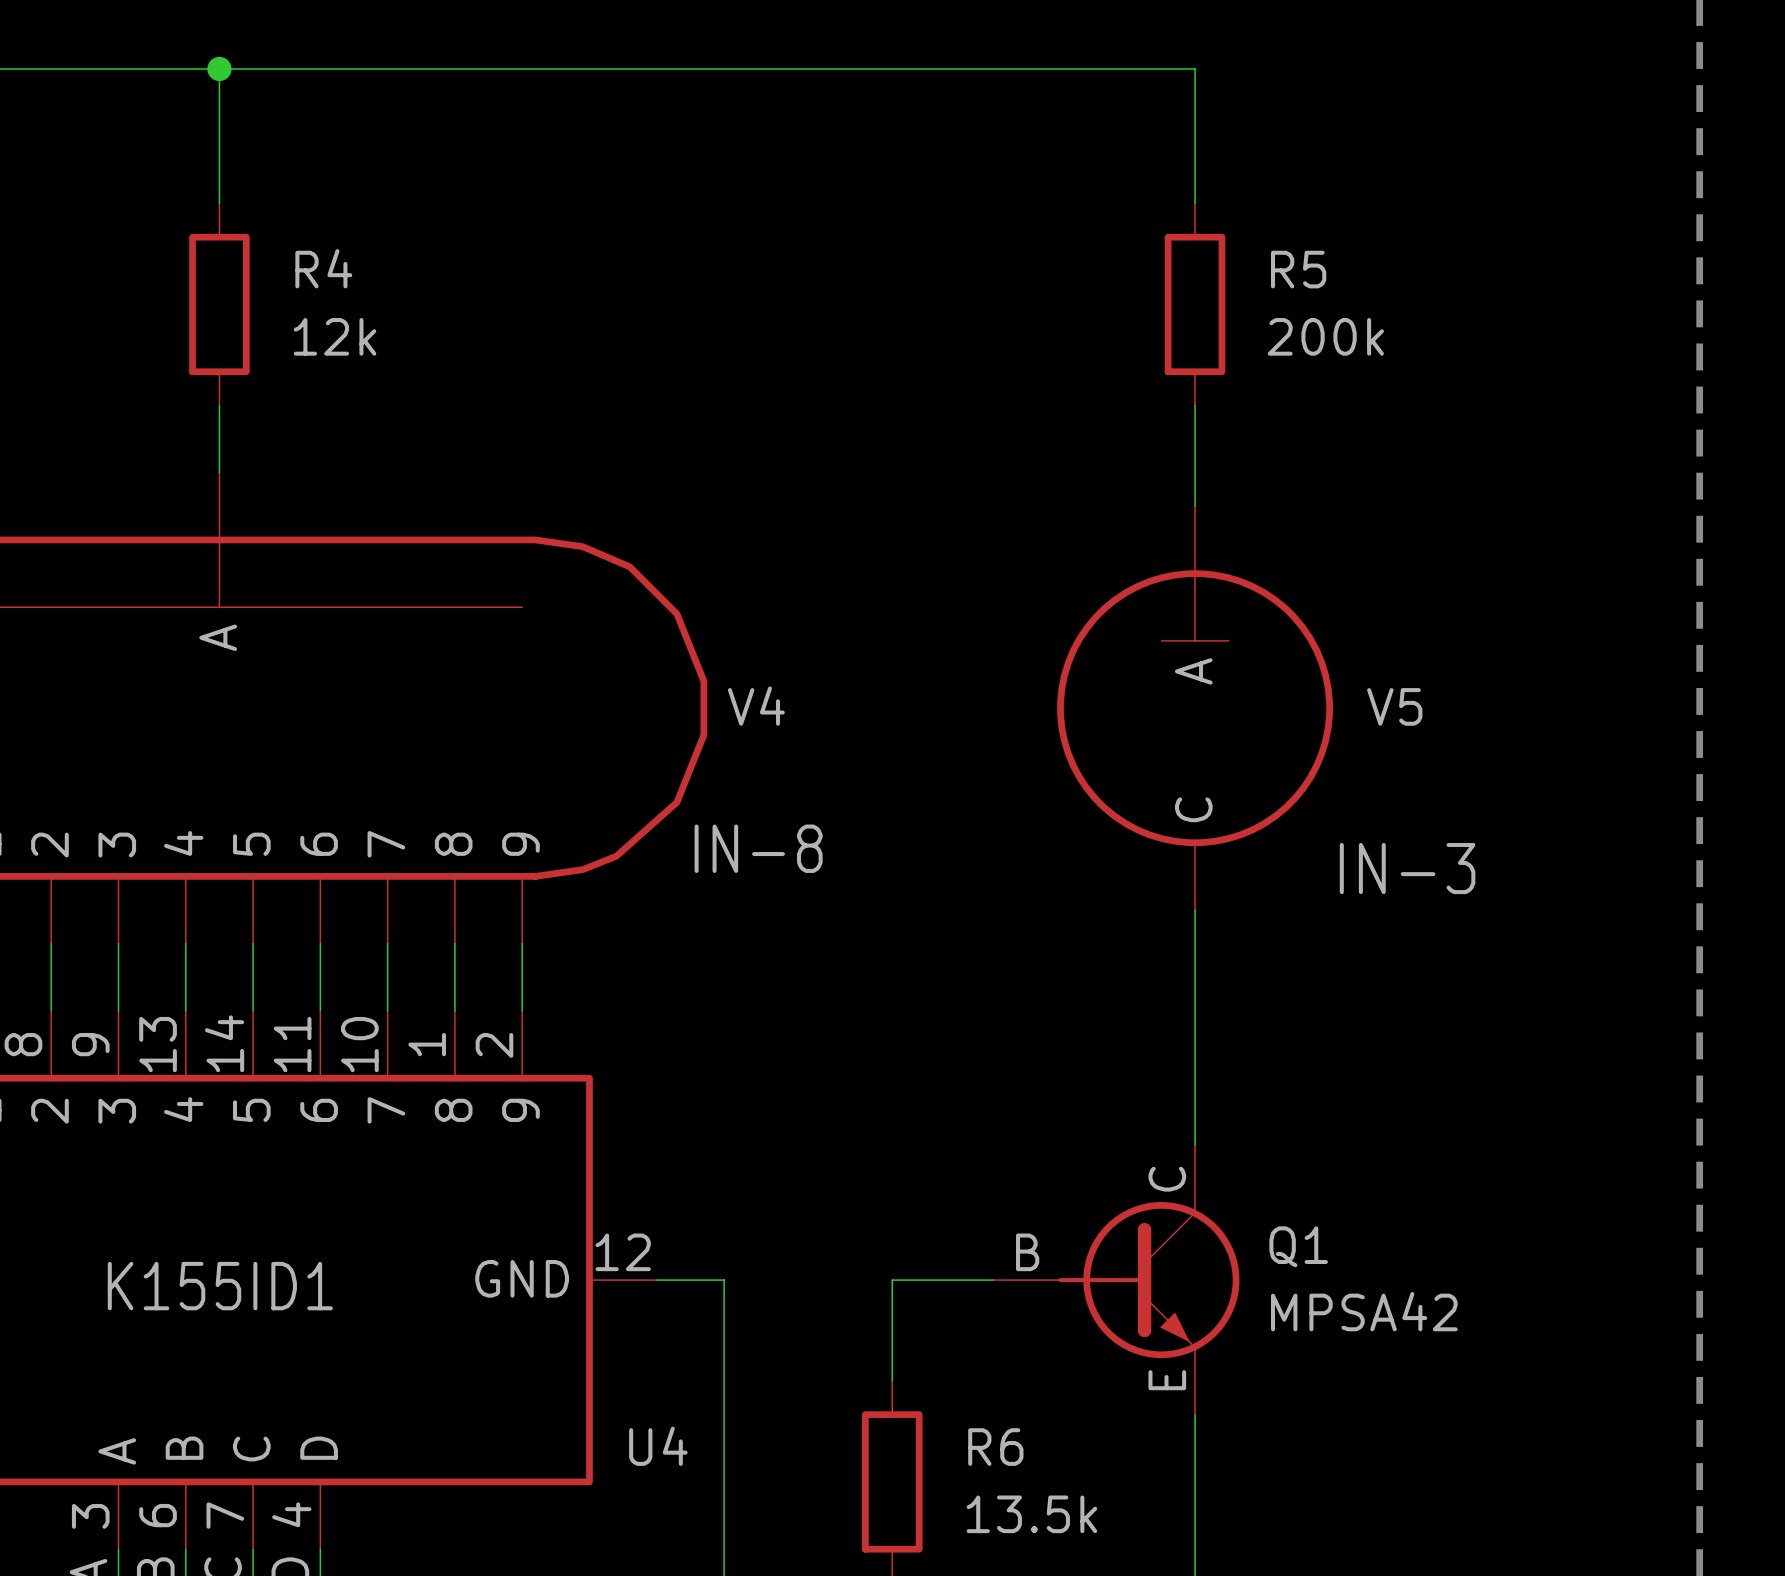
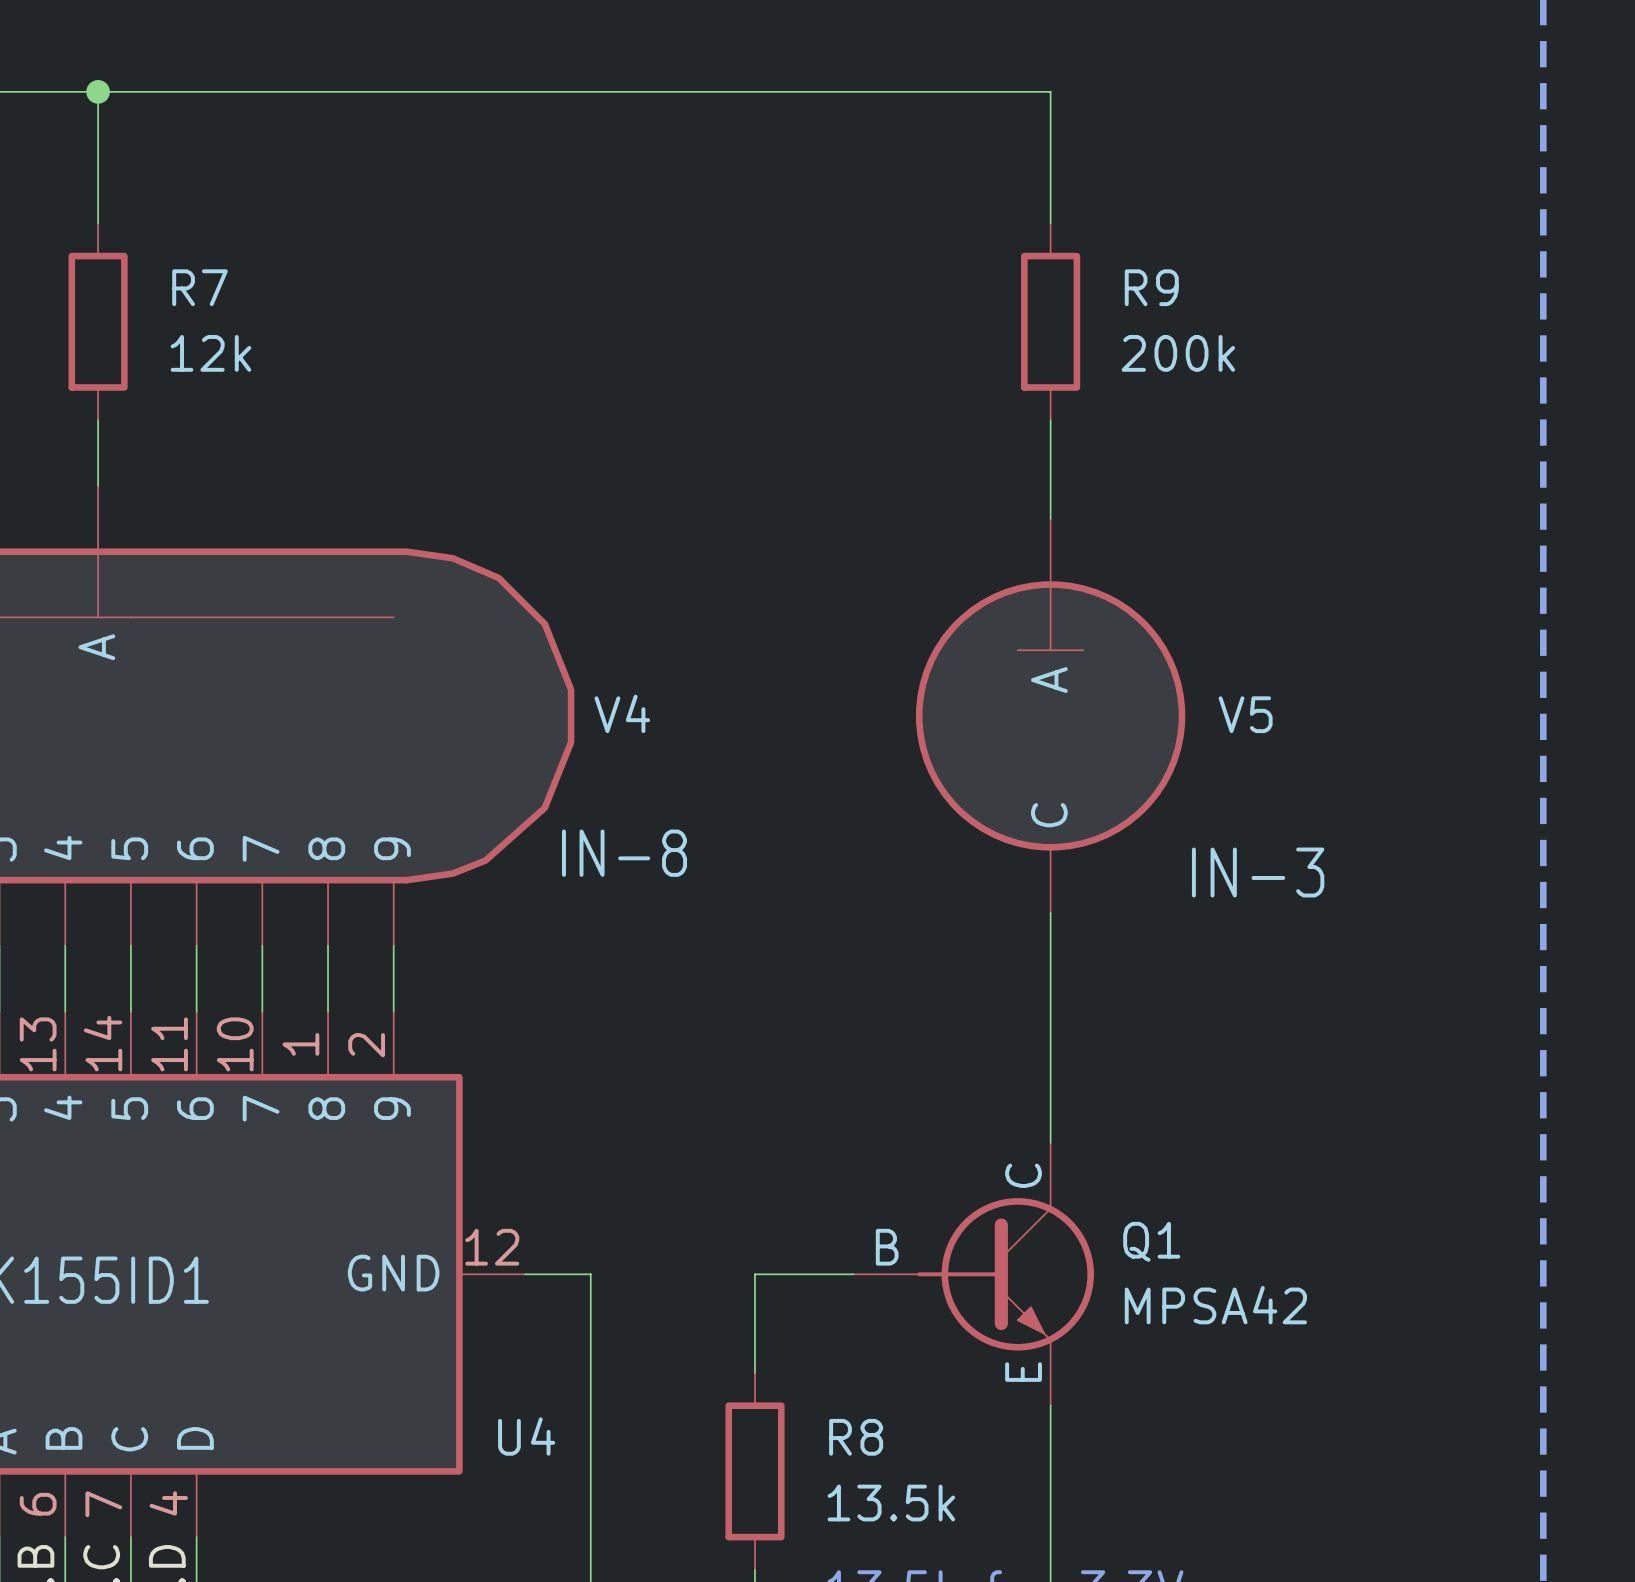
R4 name: R4 (323, 268) -> R7 (200, 287)
R5 name: R5 (1298, 269) -> R9 (1151, 287)
R6 name: R6 (995, 1447) -> R8 (856, 1437)

